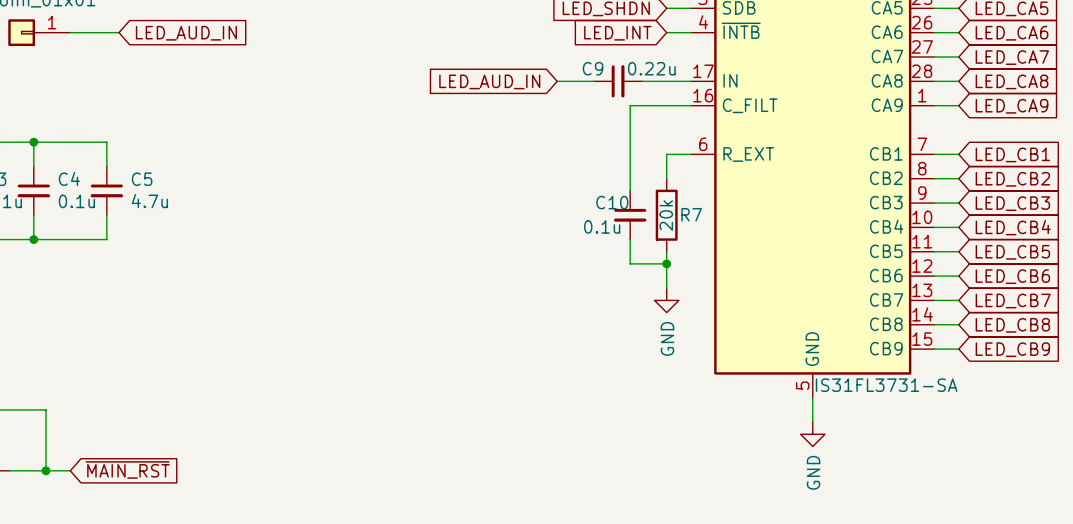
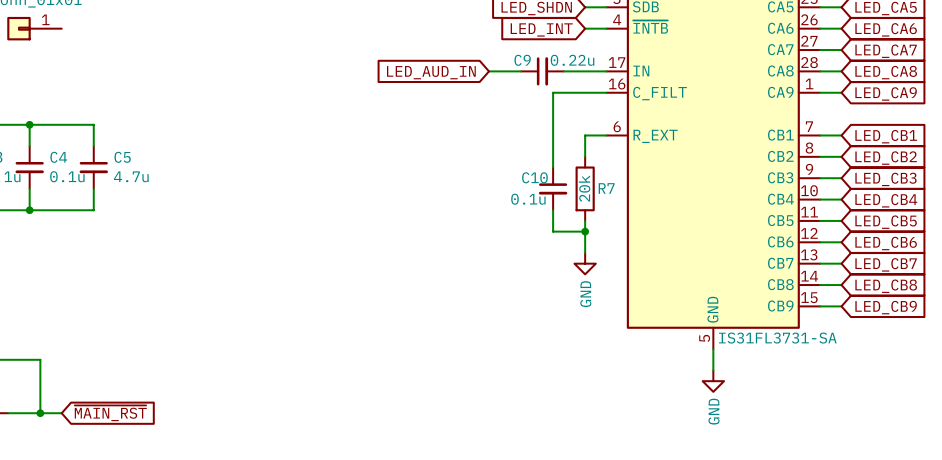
wire: (70, 32) (119, 32) -> none
global label: LED_AUD_IN (186, 33) -> none

